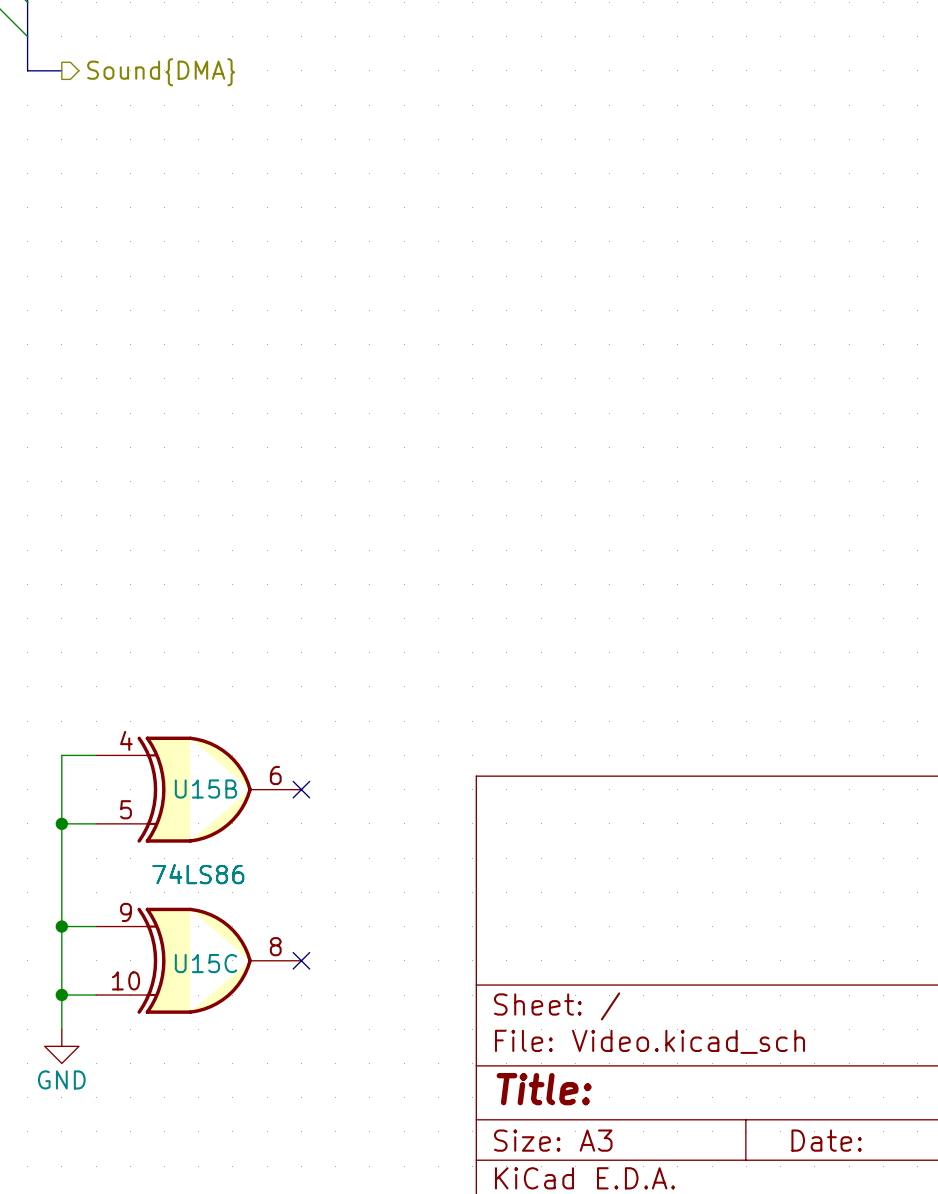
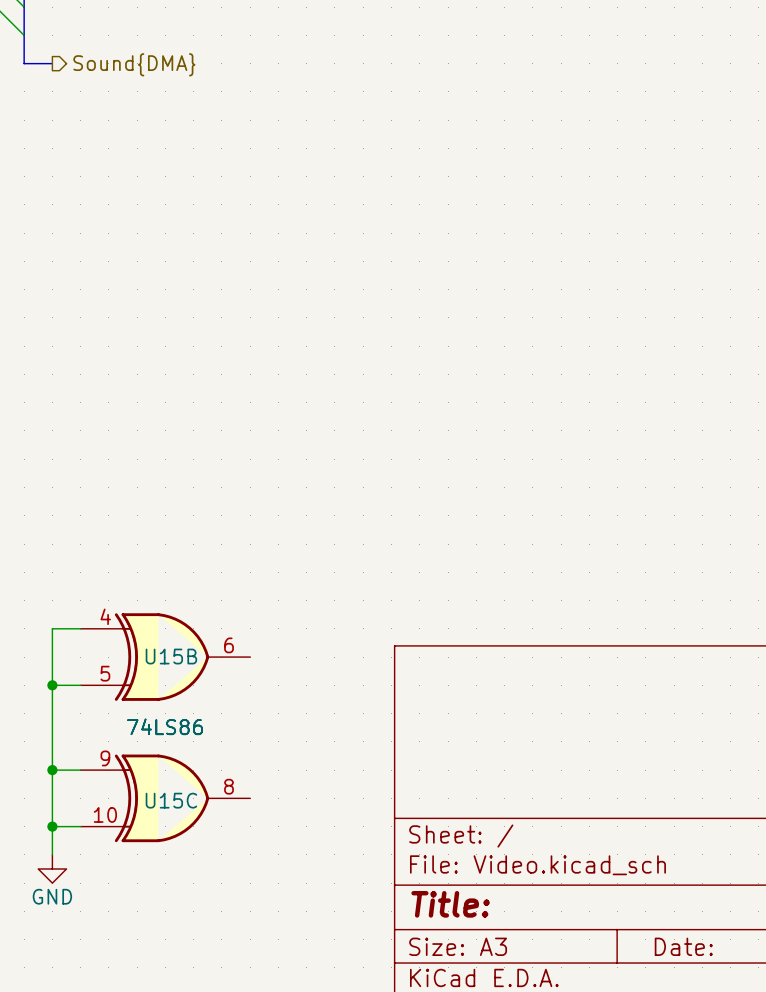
no-connect mark: (301, 789) -> none
no-connect mark: (301, 960) -> none

